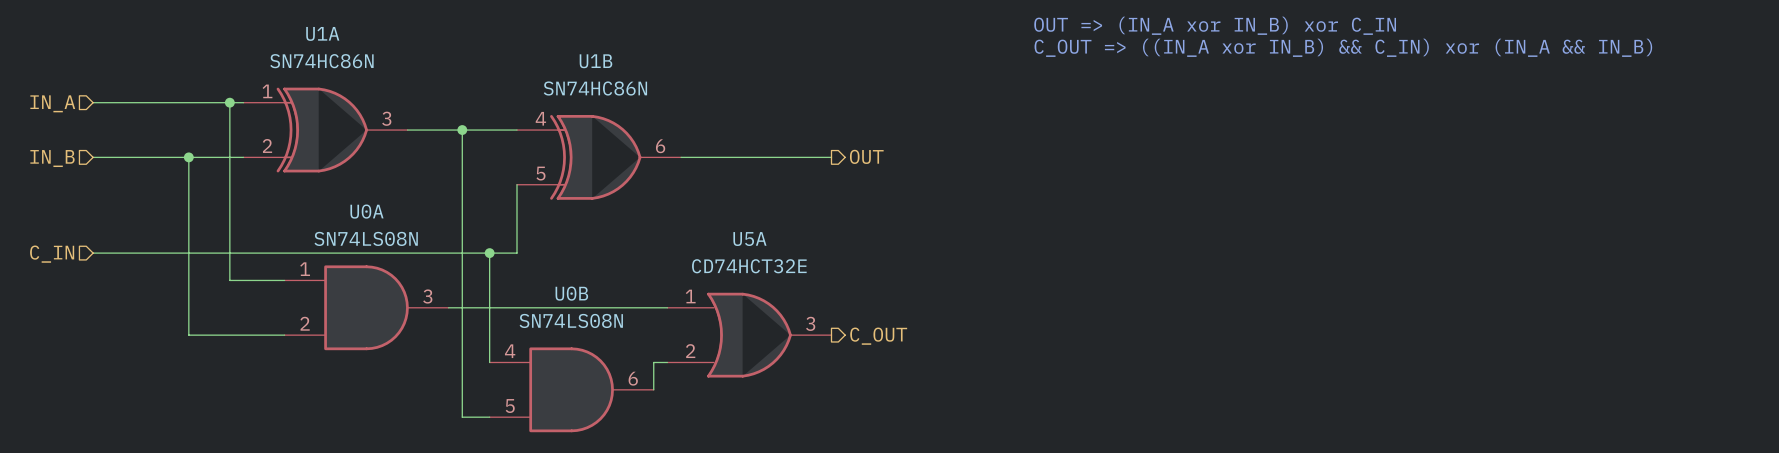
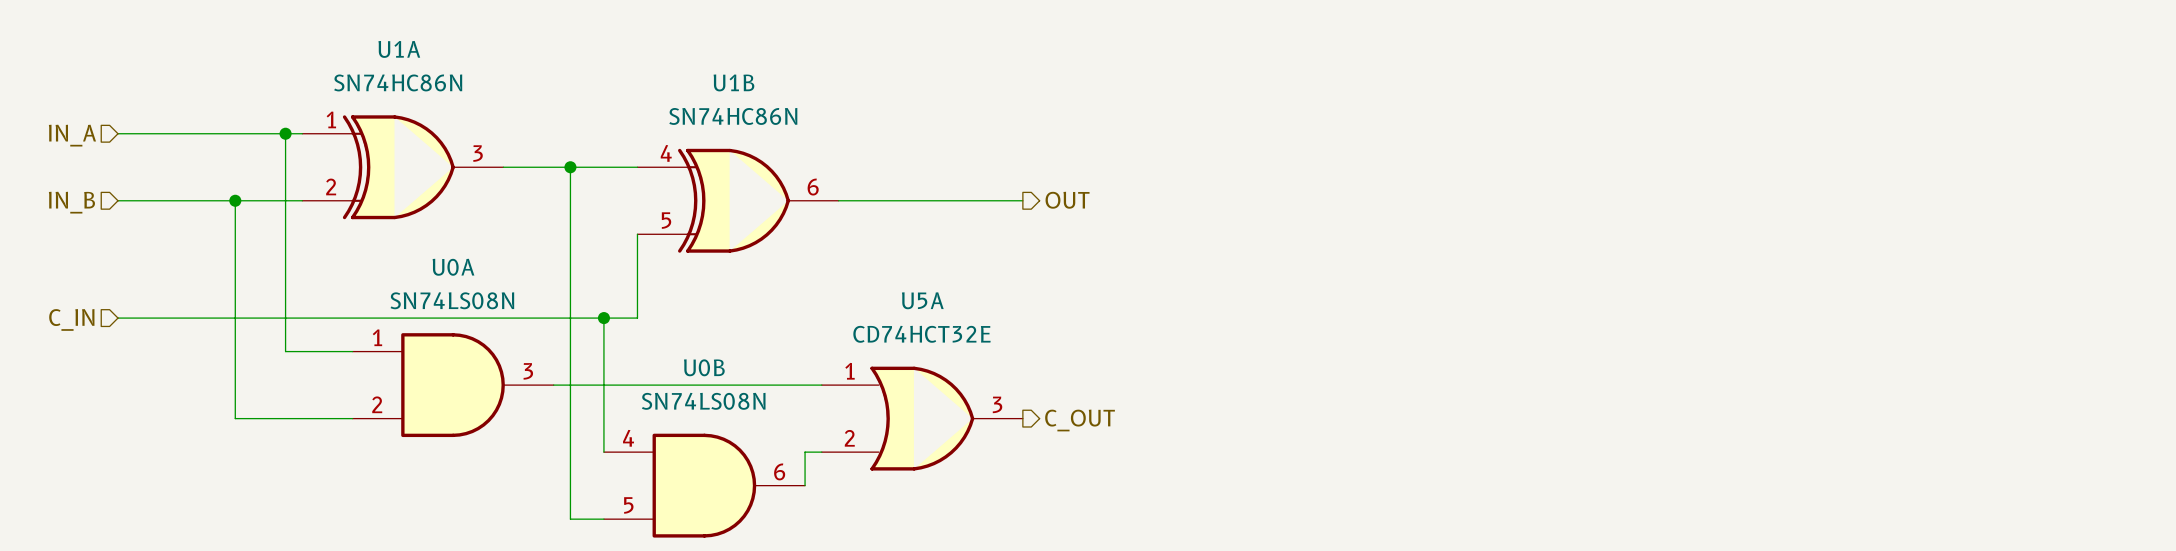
text: OUT => (IN_A xor IN_B) xor C_IN (1215, 25) -> none
text: C_OUT => ((IN_A xor IN_B) && C_IN) xor (IN_A && IN_B) (1343, 47) -> none

